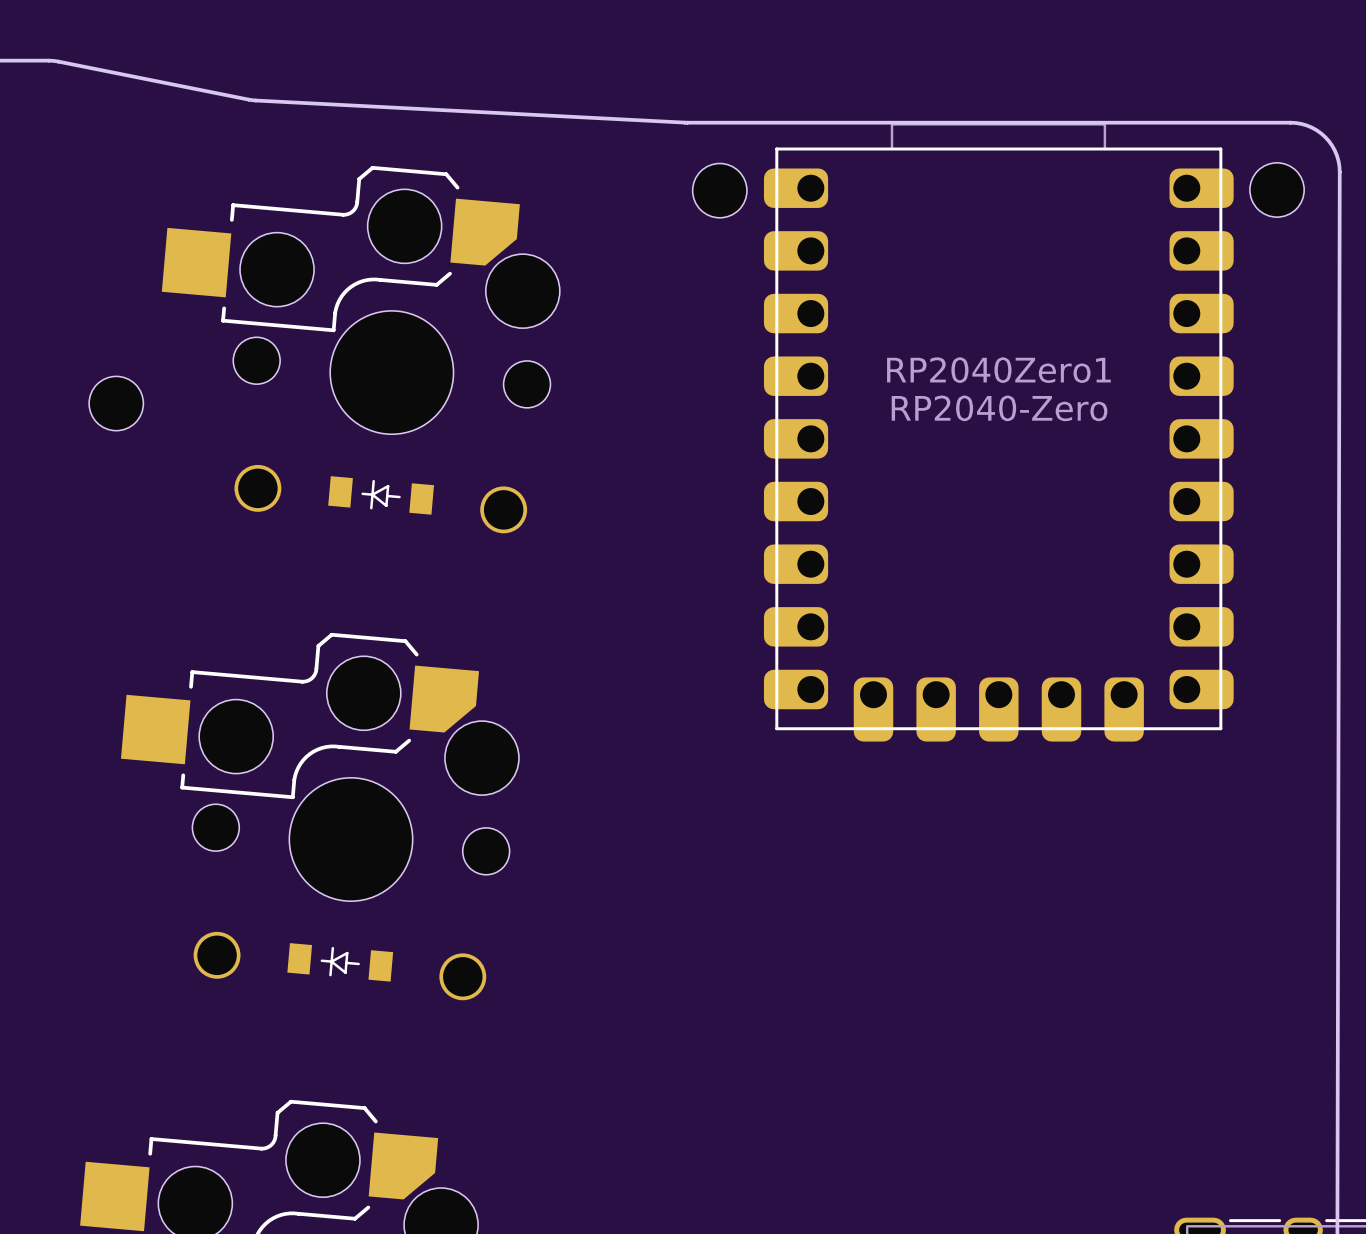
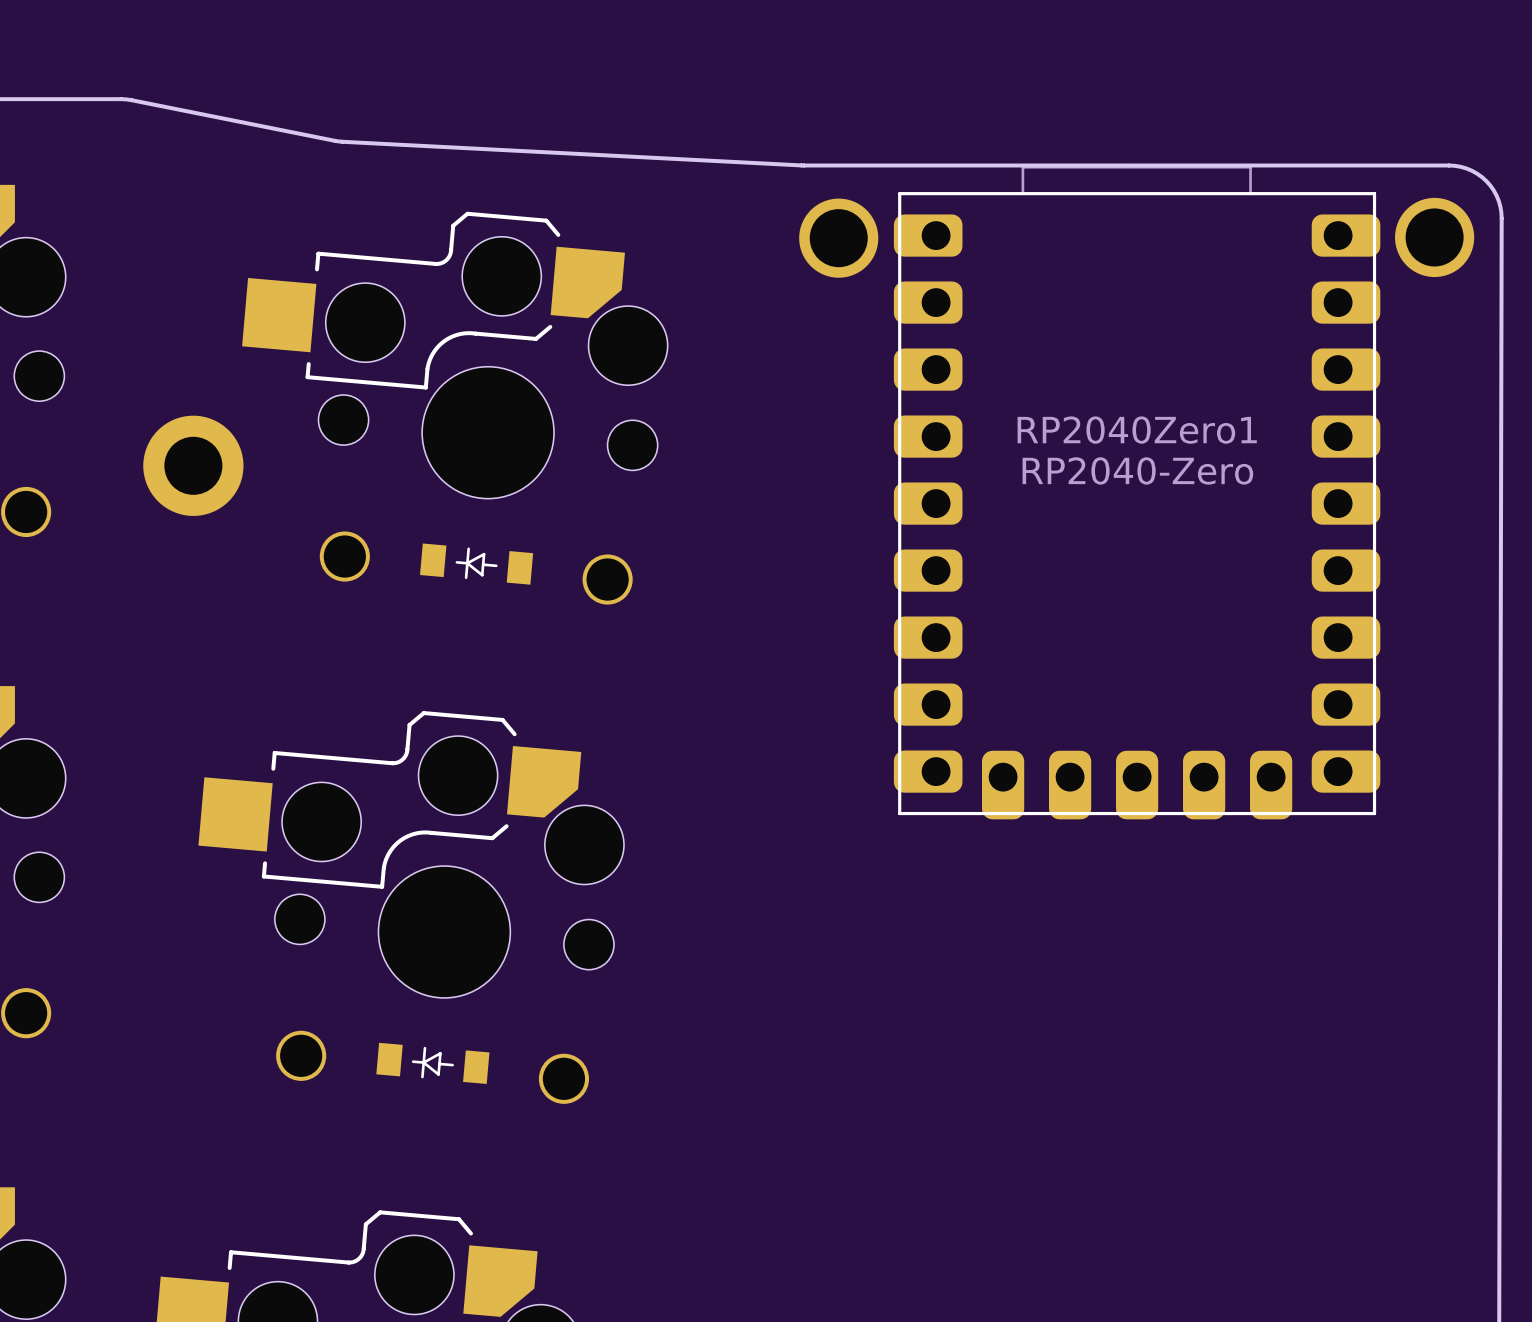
RP2040Zero1 footprint: [763, 123, 1234, 742] -> [893, 165, 1381, 820]
part footprint: [1249, 162, 1305, 218] -> [1395, 197, 1475, 278]
part footprint: [692, 163, 747, 218] -> [799, 198, 879, 278]
part footprint: [89, 376, 144, 431] -> [143, 415, 244, 516]

